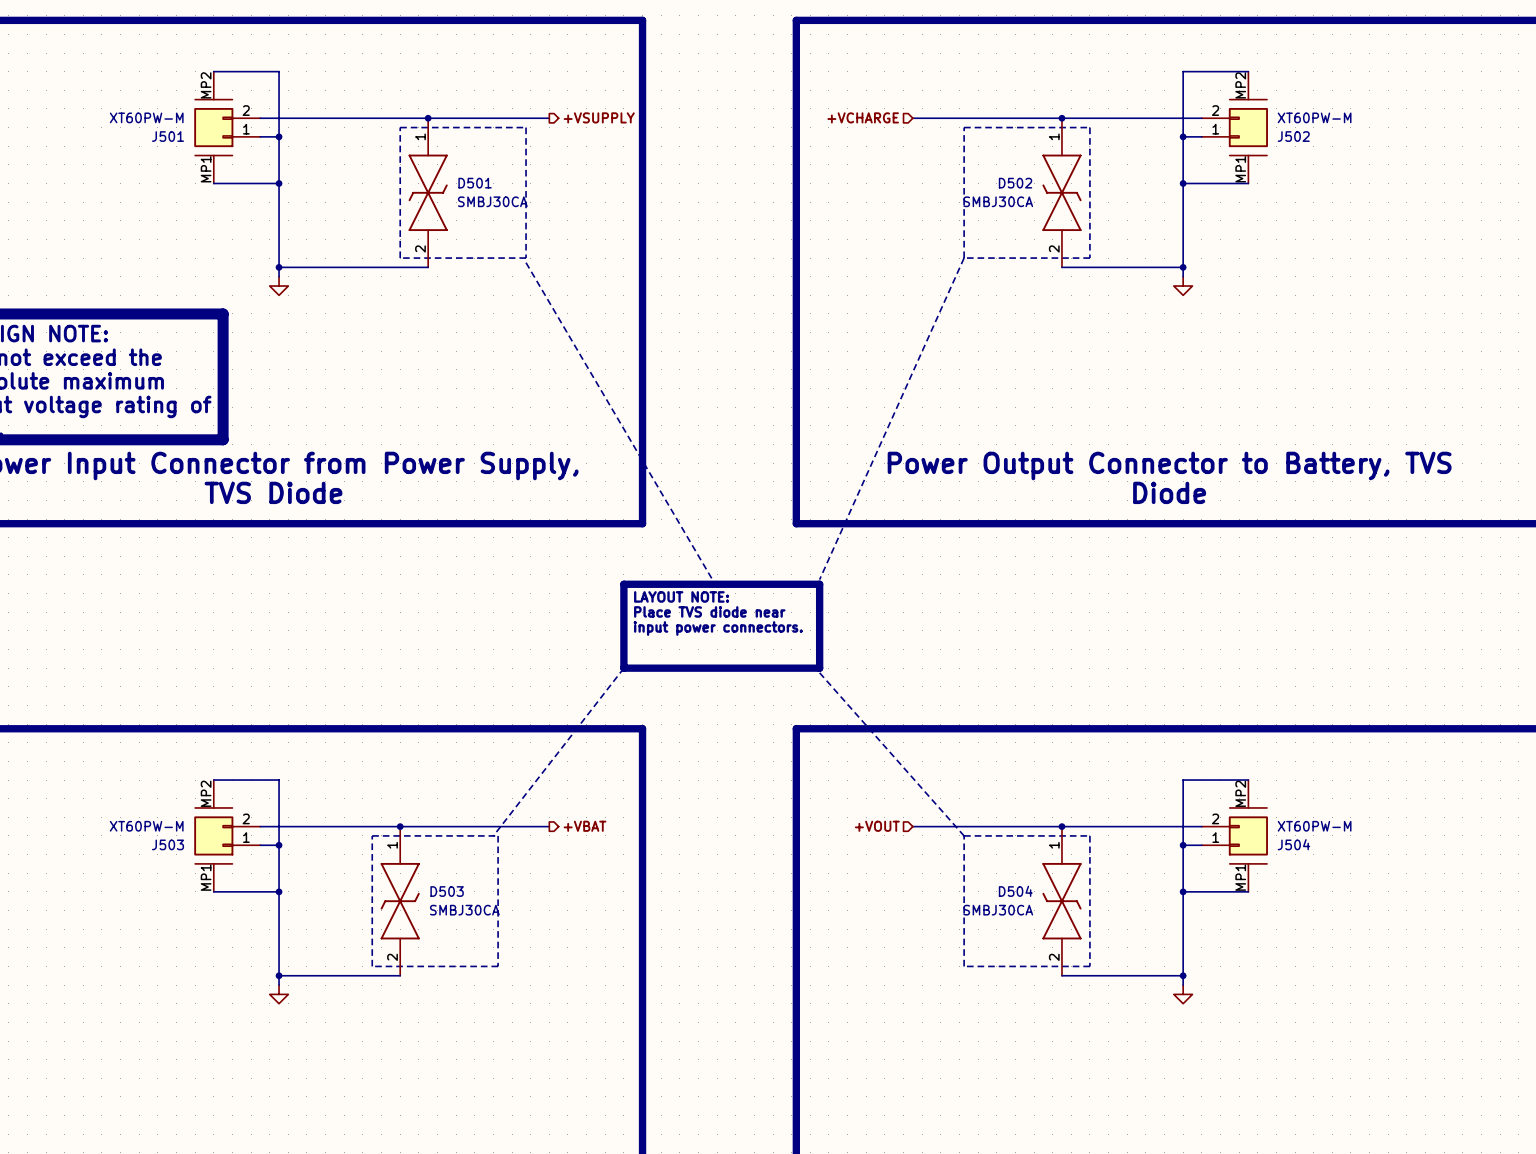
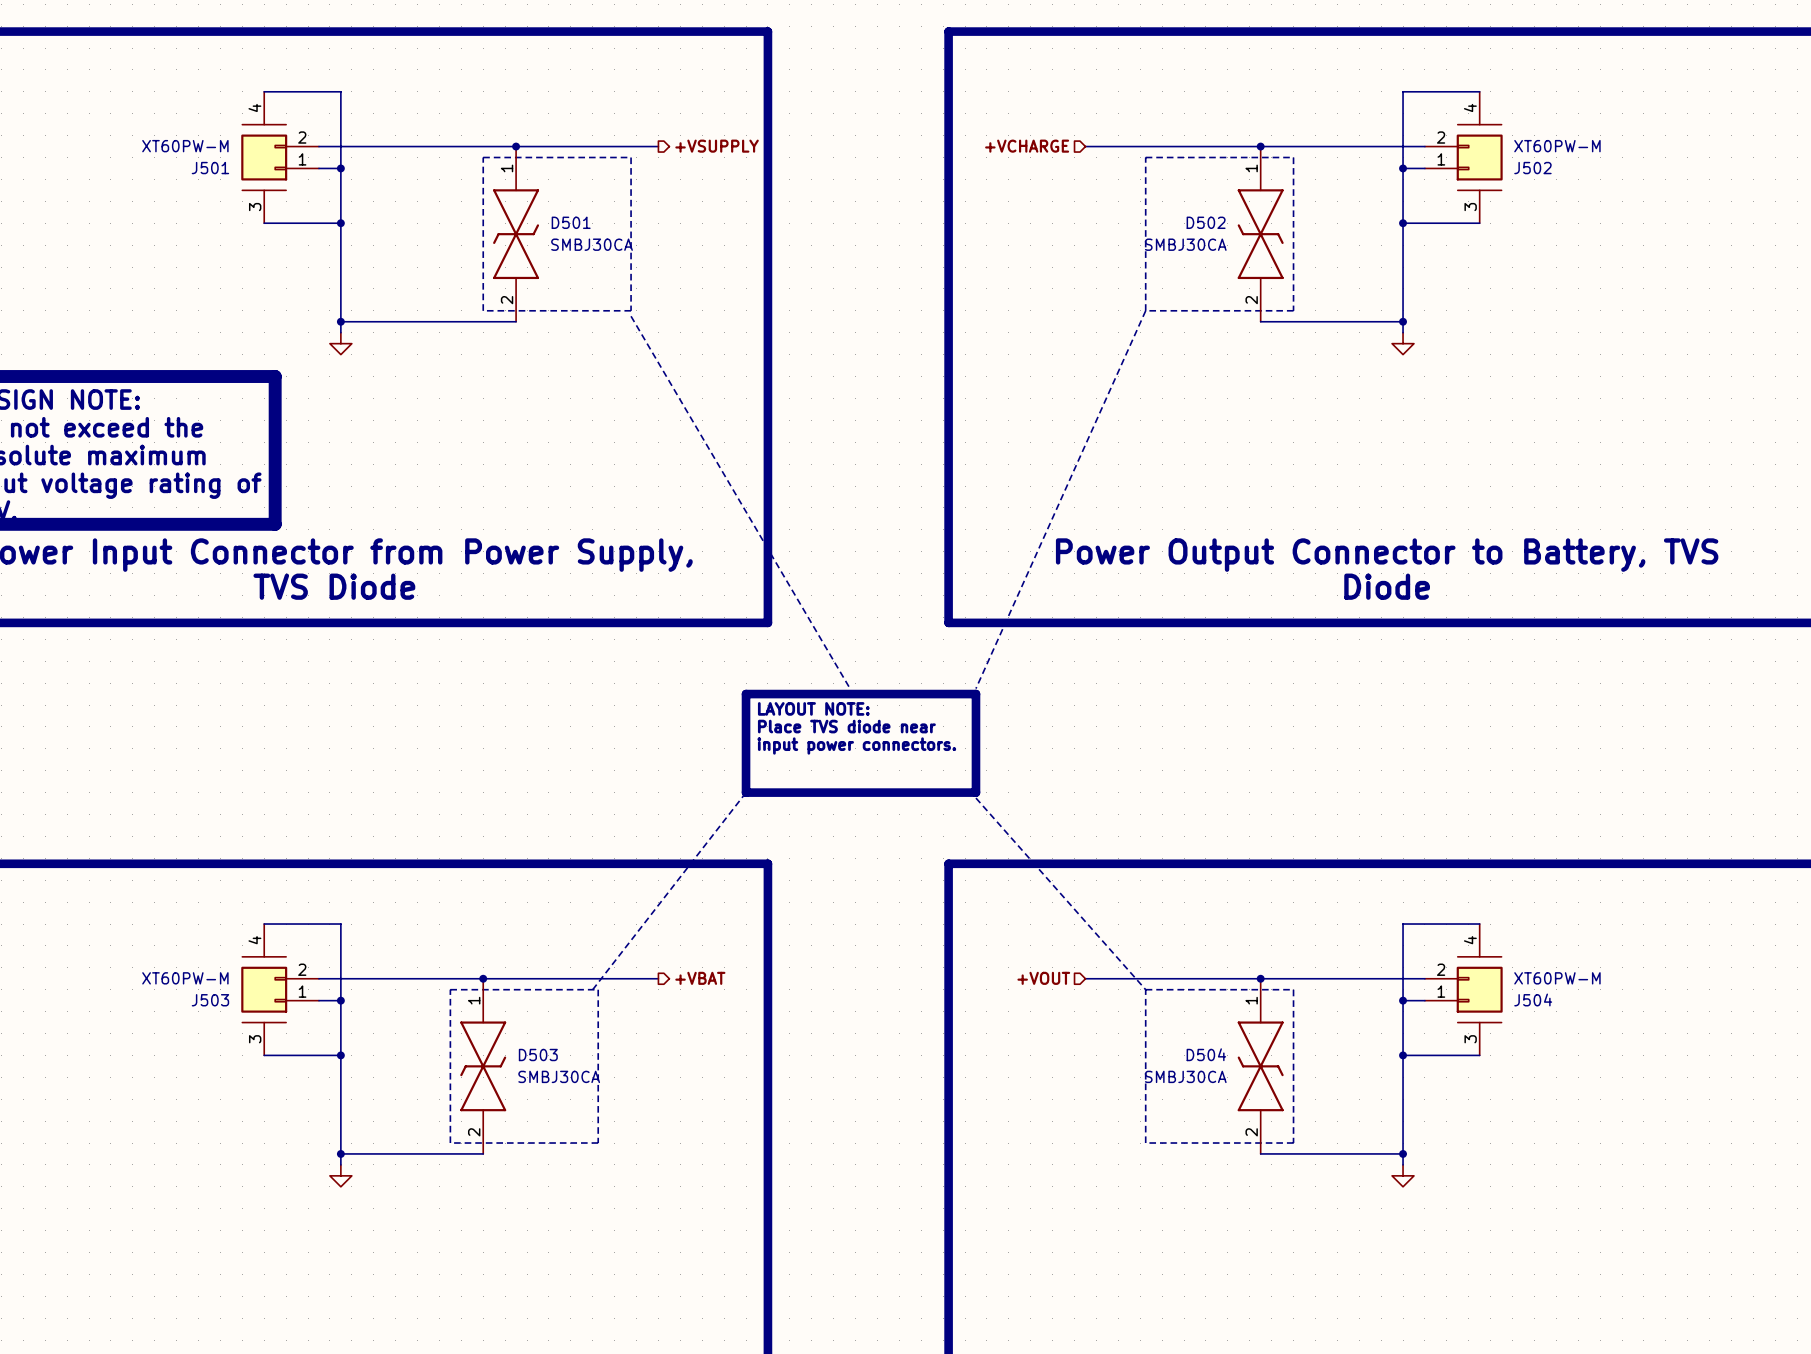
J501 pin number: MP2 (206, 85) -> 4 (254, 107)
J502 pin number: MP2 (1240, 85) -> 4 (1470, 107)
J501 pin number: MP1 (206, 169) -> 3 (255, 207)
J502 pin number: MP1 (1240, 169) -> 3 (1470, 207)
J503 pin number: MP2 (206, 793) -> 4 (254, 940)
J504 pin number: MP2 (1240, 793) -> 4 (1470, 940)
J503 pin number: MP1 (206, 877) -> 3 (255, 1039)
J504 pin number: MP1 (1240, 877) -> 3 (1470, 1039)

